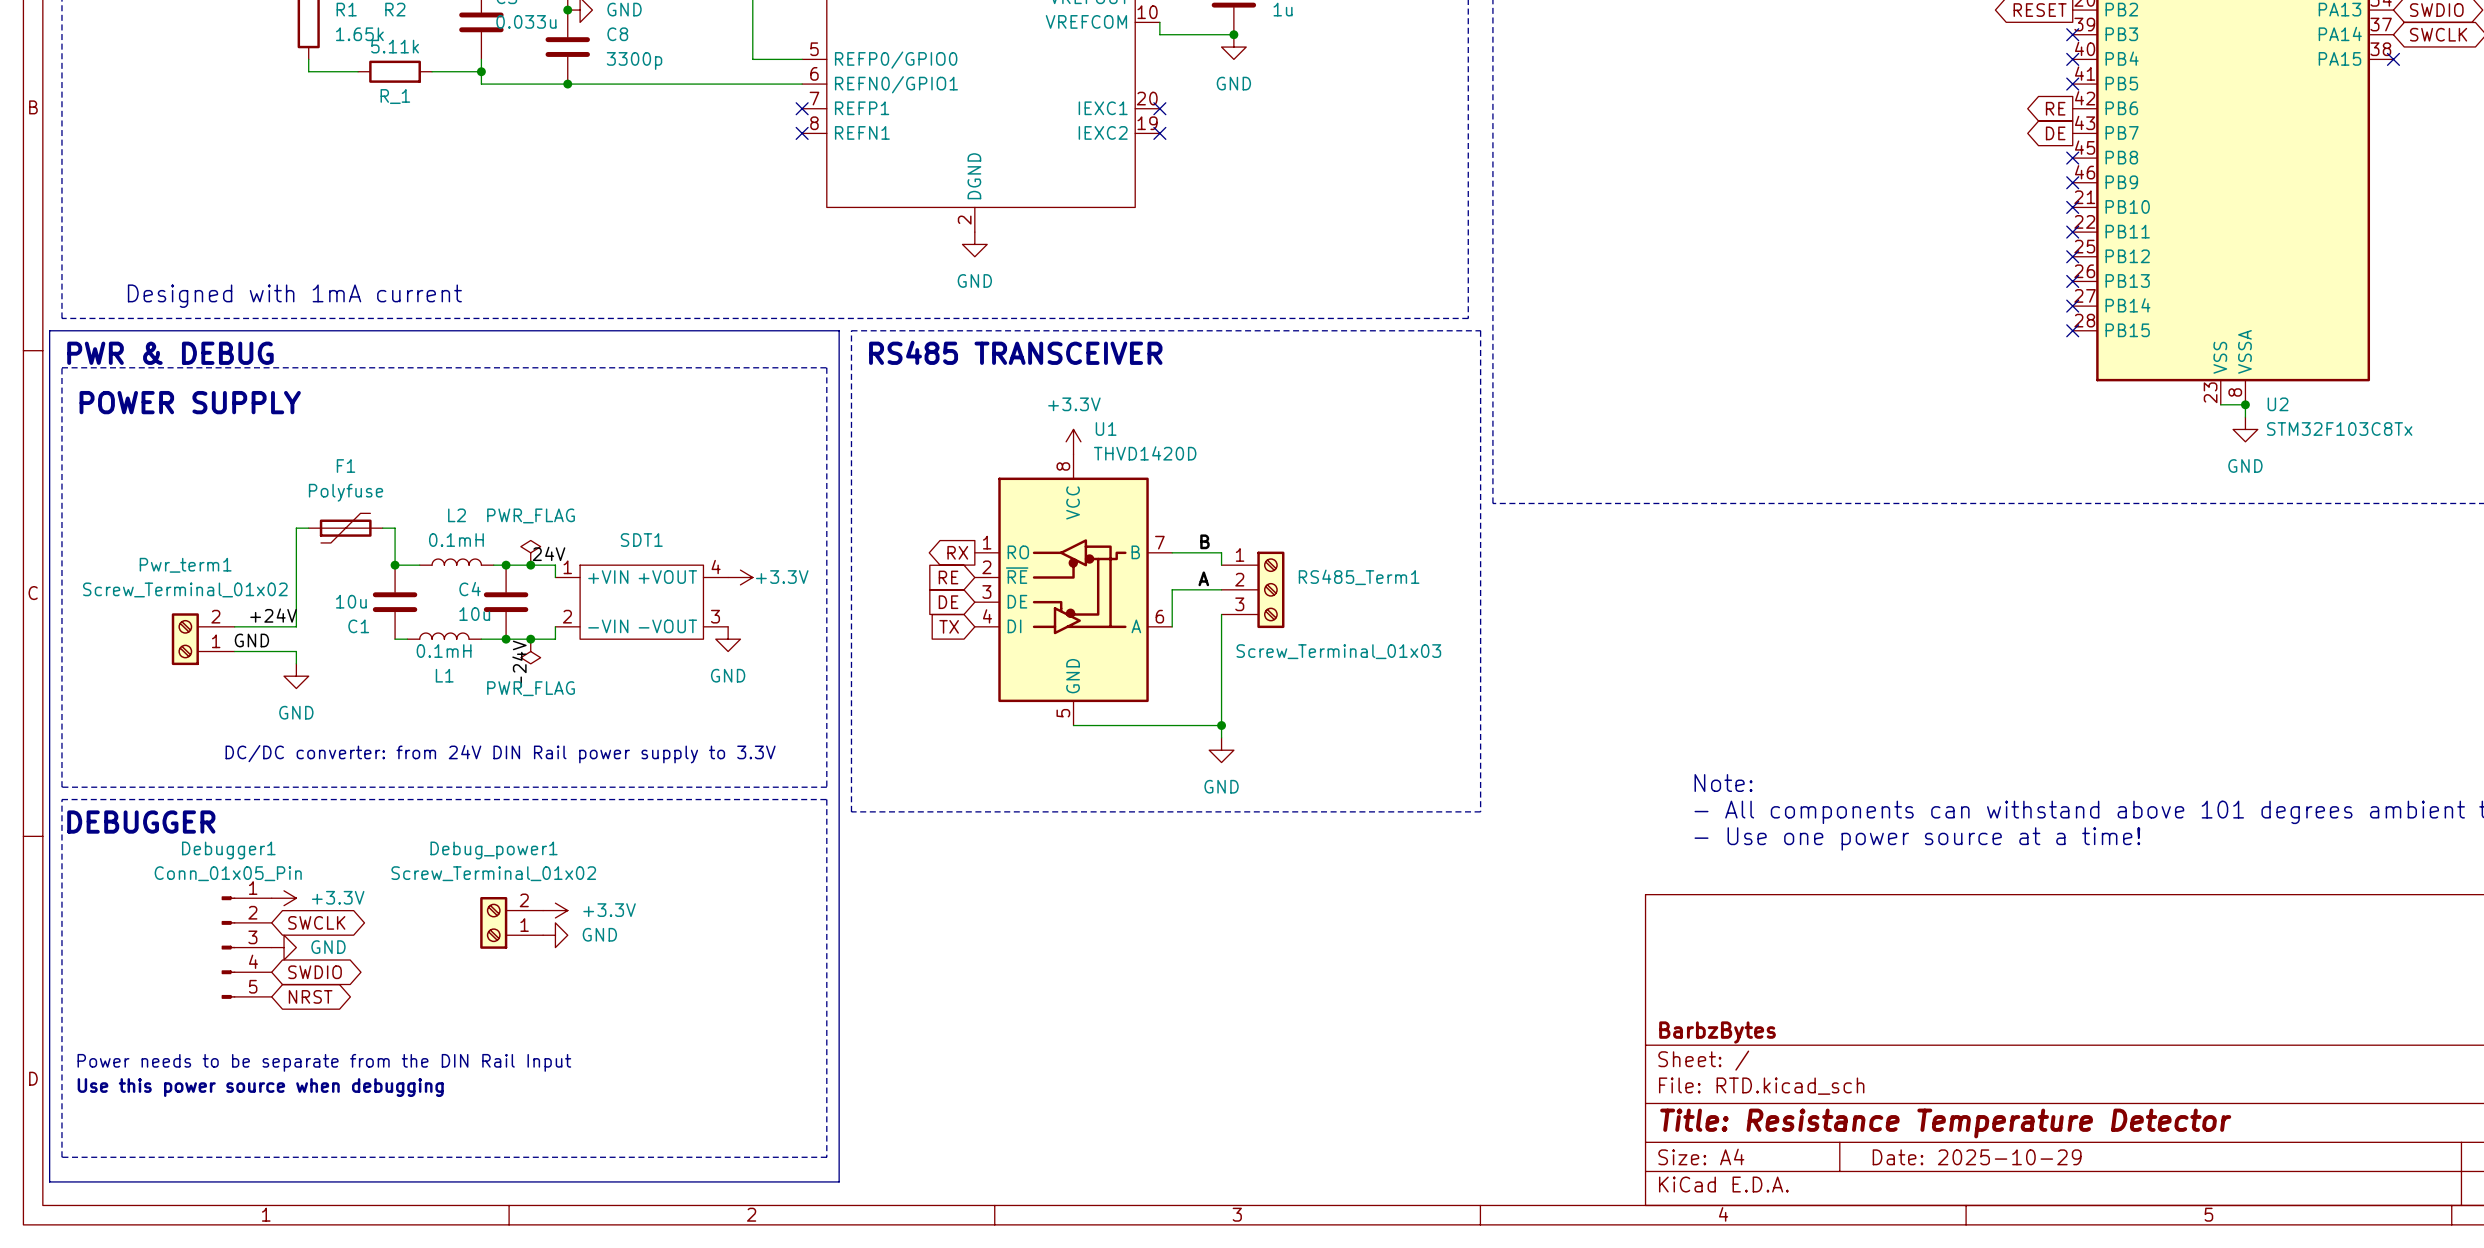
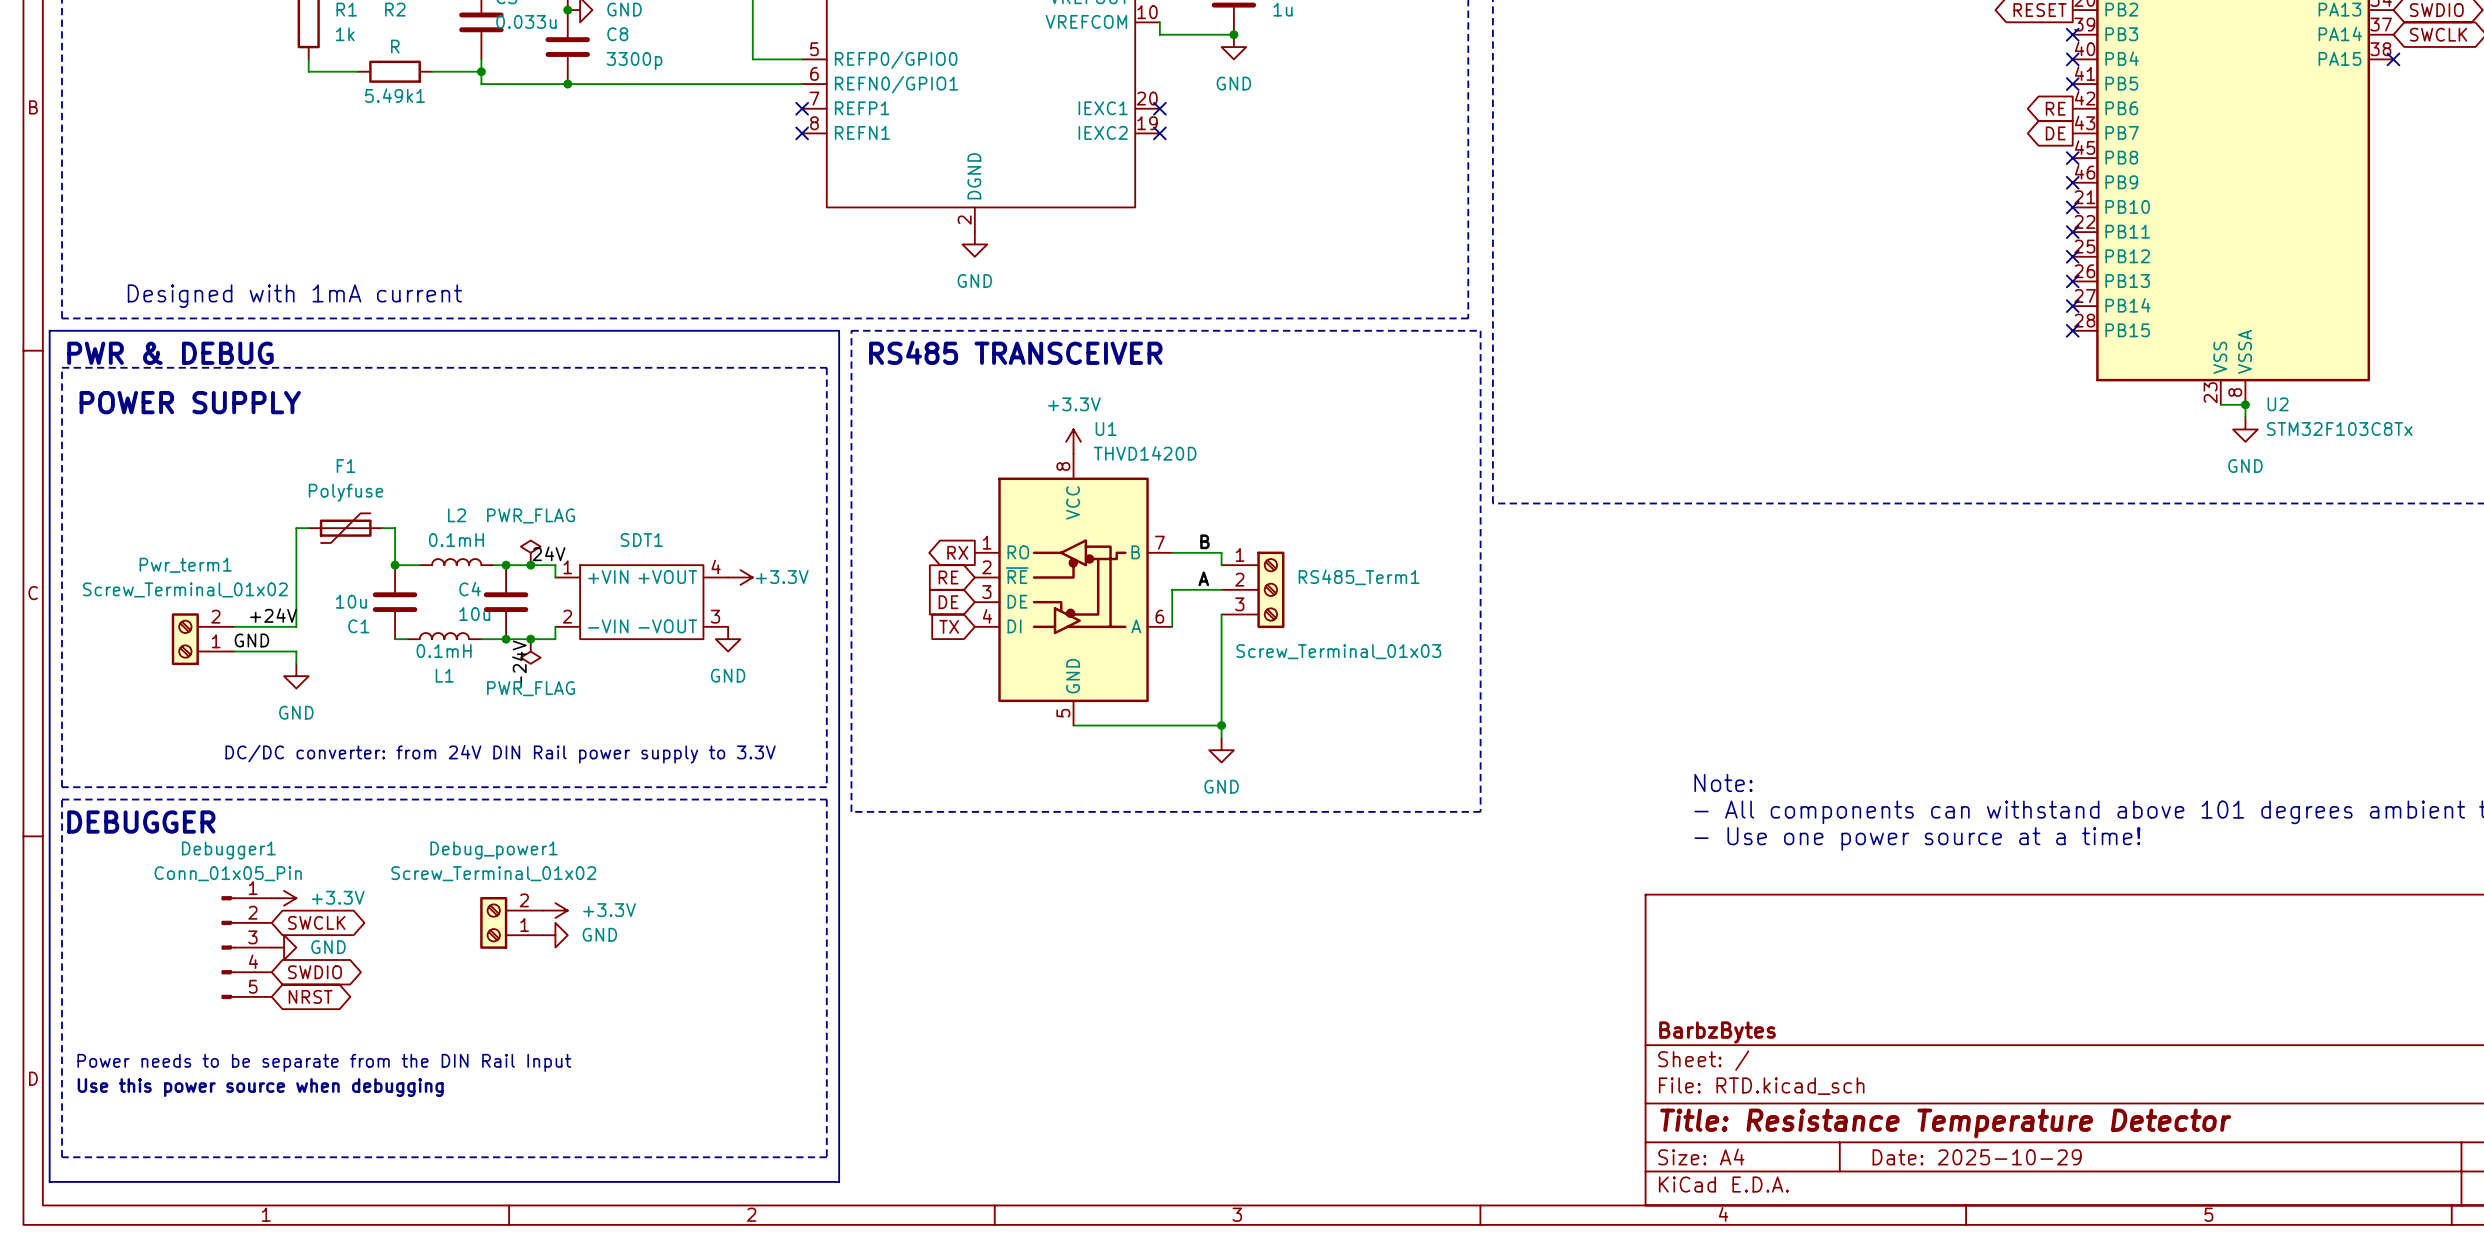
R1 value: 1.65k (359, 34) -> 1k (345, 34)
R_1 value: 5.11k (395, 46) -> R (395, 46)
R_1 name: R_1 (395, 96) -> 5.49k1 (395, 95)

